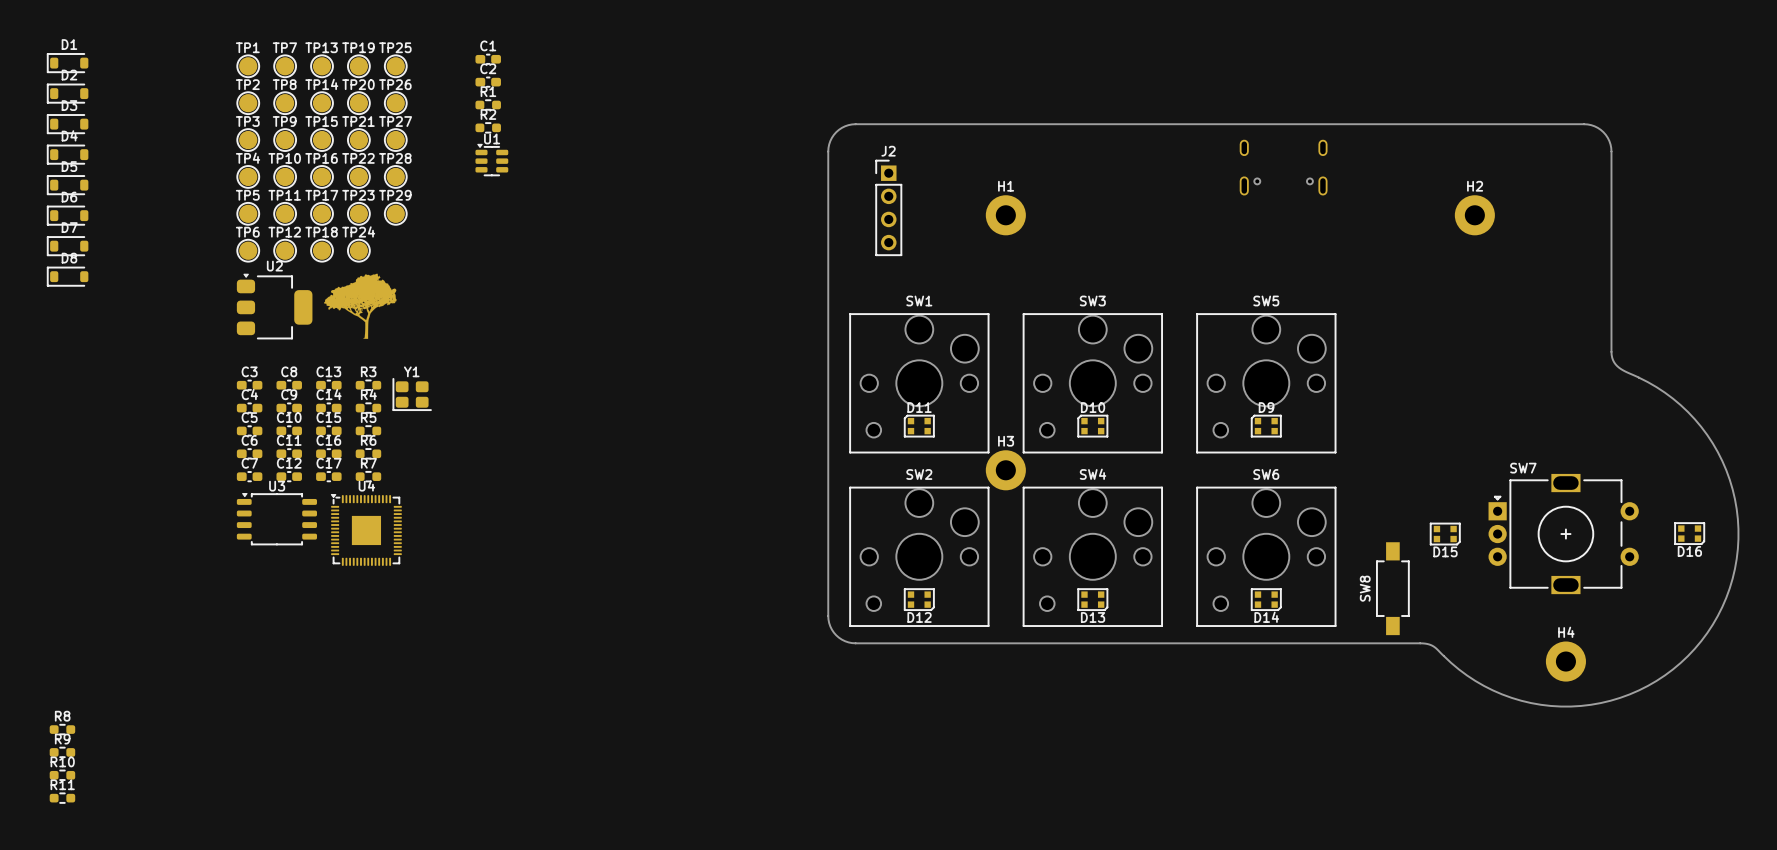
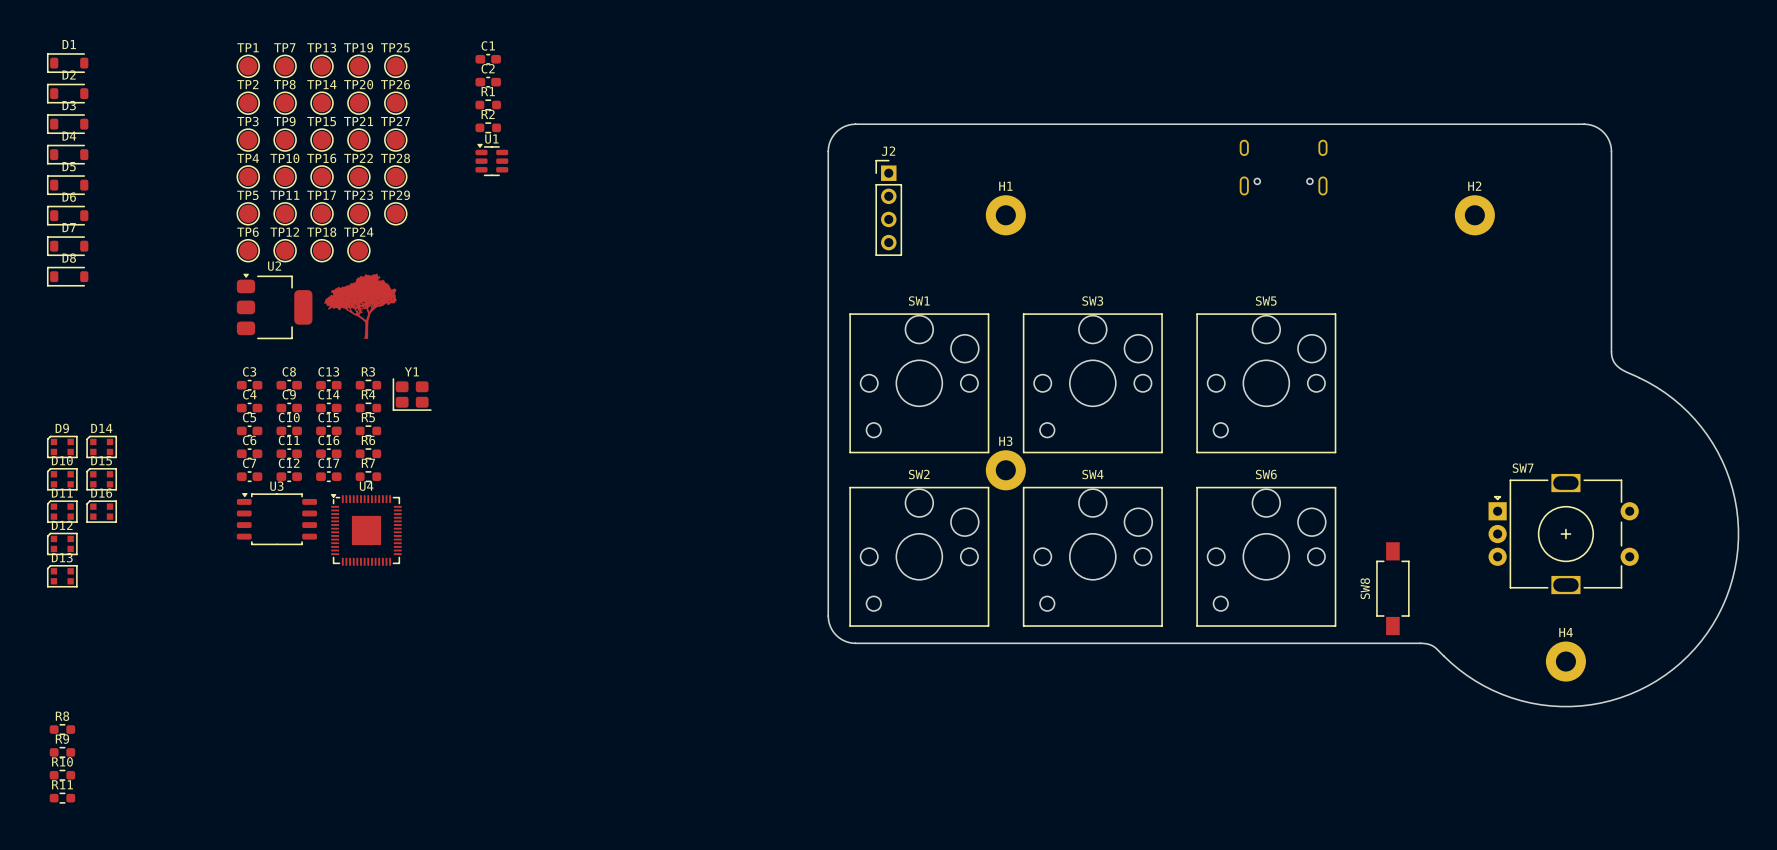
D11 position: (919, 426) -> (62, 511)
D10 position: (1092, 426) -> (62, 479)
D9 position: (1266, 426) -> (62, 446)
D16 rotation: 0° (1689, 533) -> 180° (101, 511)
D16 position: (1689, 533) -> (101, 511)
D15 rotation: 0° (1445, 534) -> 180° (101, 479)
D15 position: (1445, 534) -> (101, 479)
D12 rotation: 0° (919, 599) -> 180° (62, 543)
D12 position: (919, 599) -> (62, 543)
D13 rotation: 0° (1092, 599) -> 180° (62, 576)
D13 position: (1092, 599) -> (62, 576)
D14 rotation: 0° (1266, 599) -> 180° (101, 446)
D14 position: (1266, 599) -> (101, 446)

